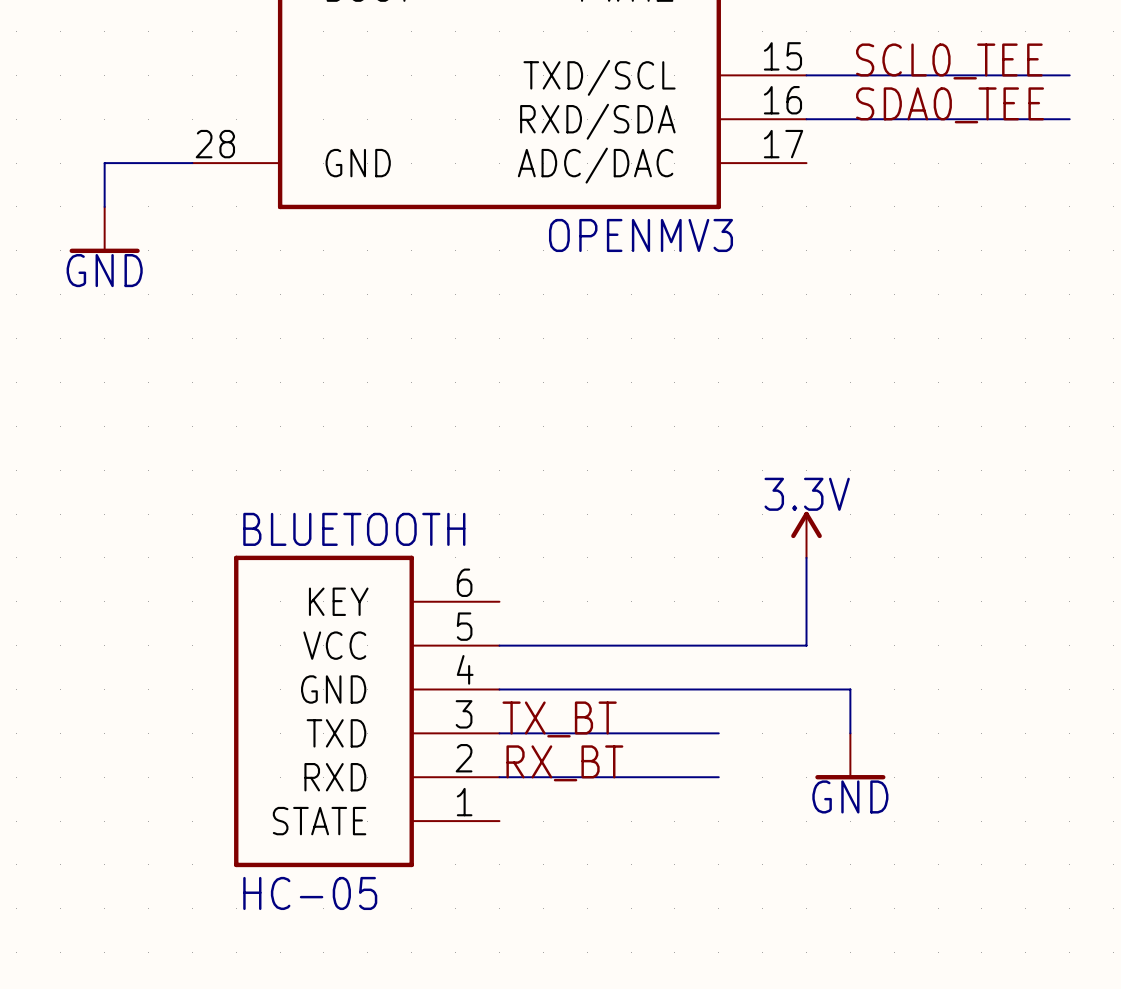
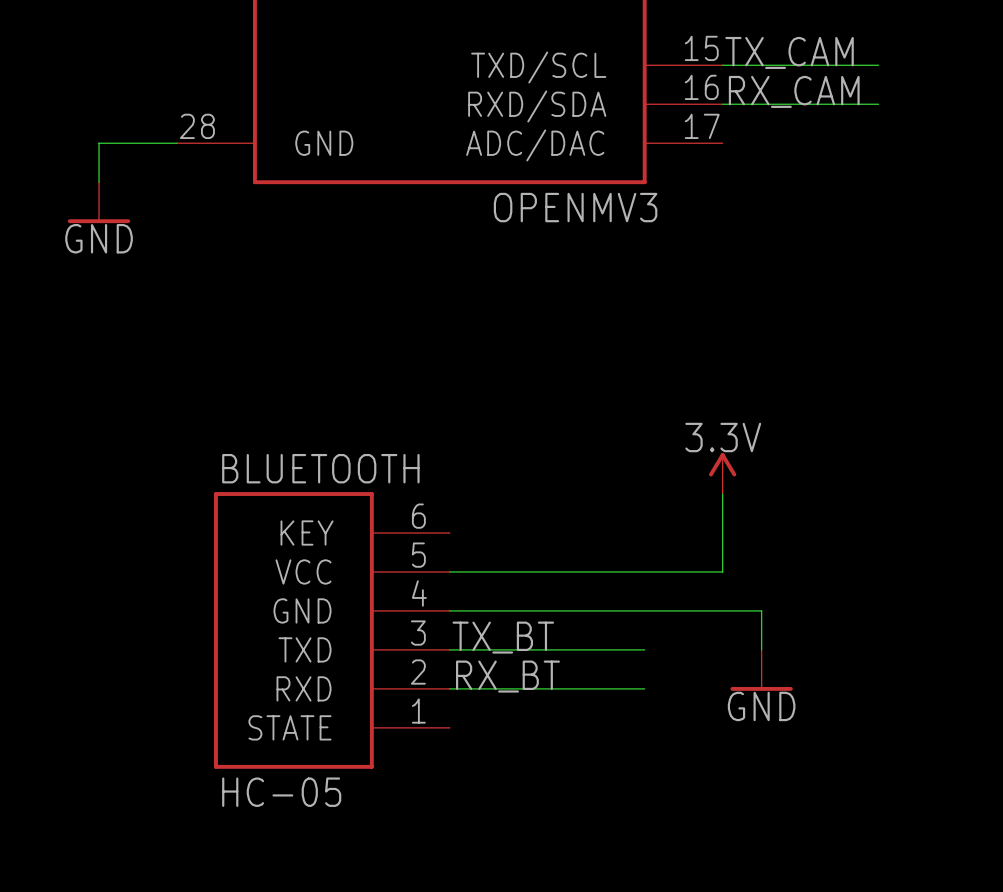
label: none -> TX_CAM (789, 52)
label: SCL0_TEE (949, 61) -> none
wire: (981, 75) (1069, 75) -> none
label: none -> RX_CAM (794, 91)
label: SDA0_TEE (950, 105) -> none
wire: (981, 119) (1069, 119) -> none

